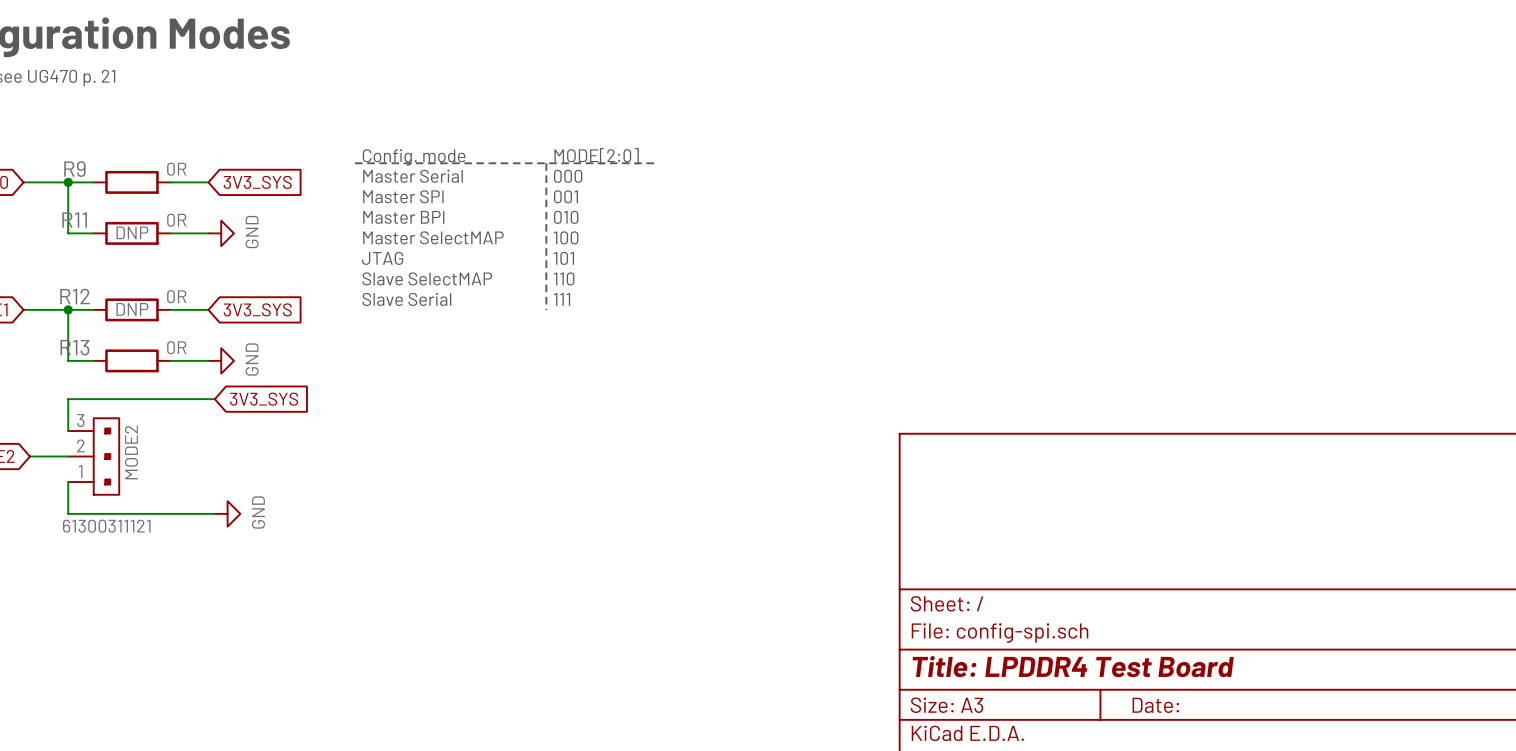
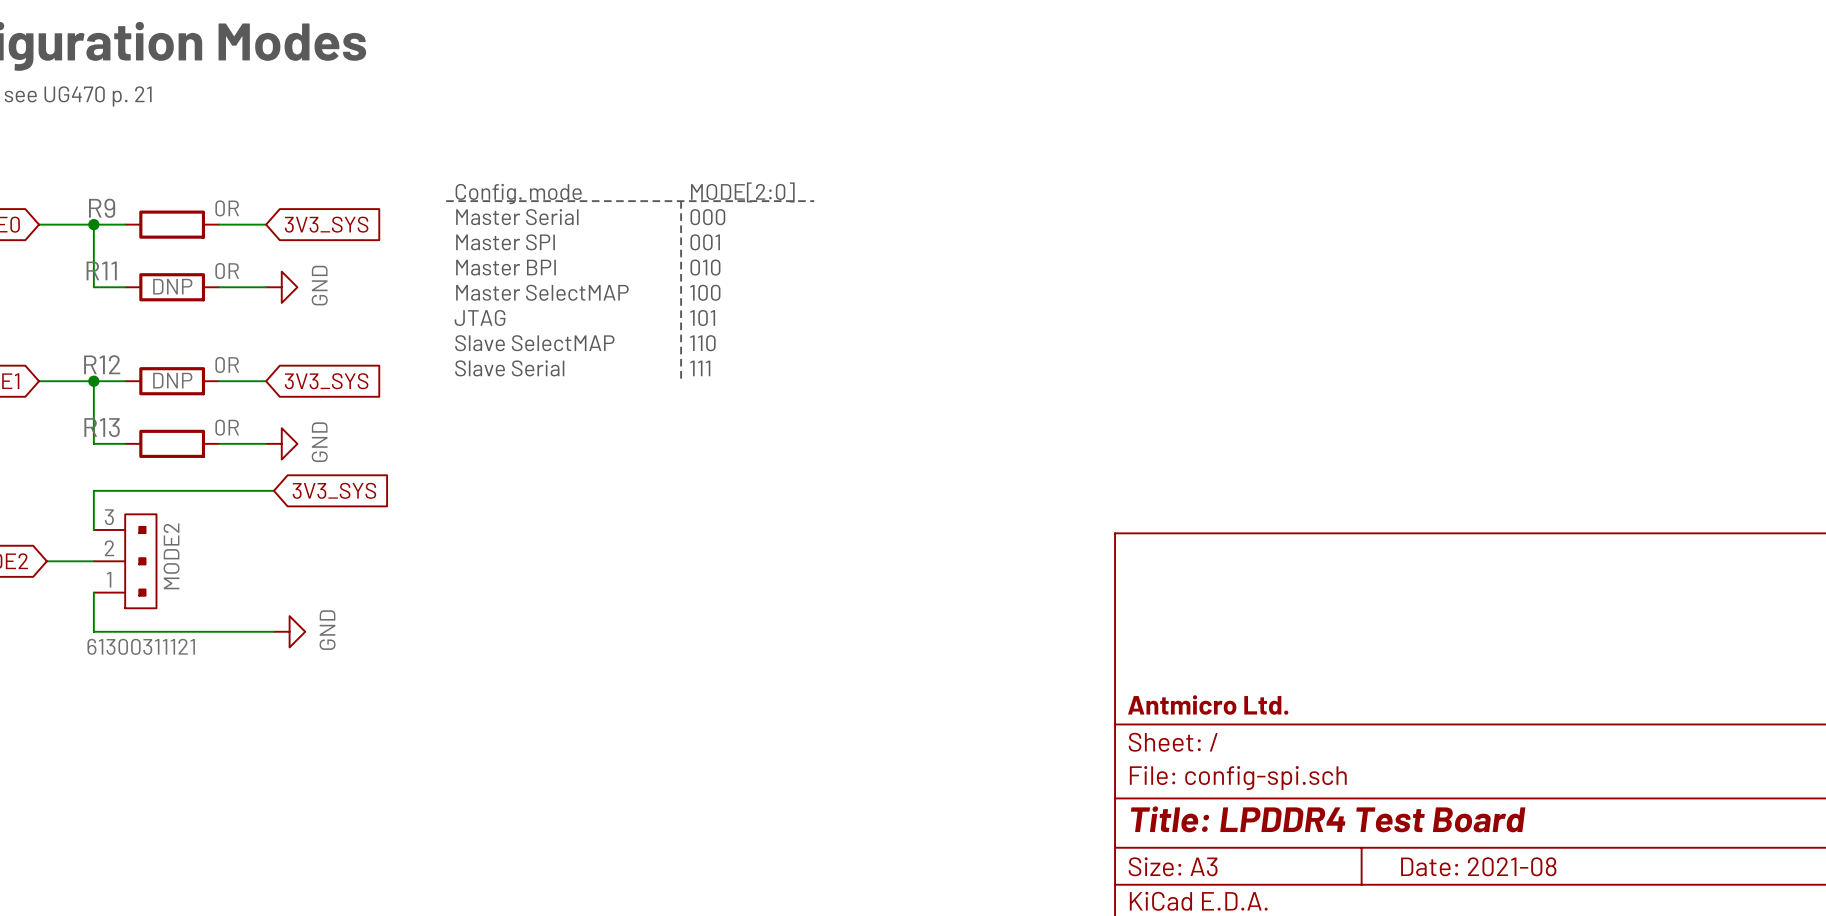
title block: none -> Antmicro Ltd. (1208, 704)
title block: Date: (1155, 705) -> Date: 2021-08 (1478, 866)

